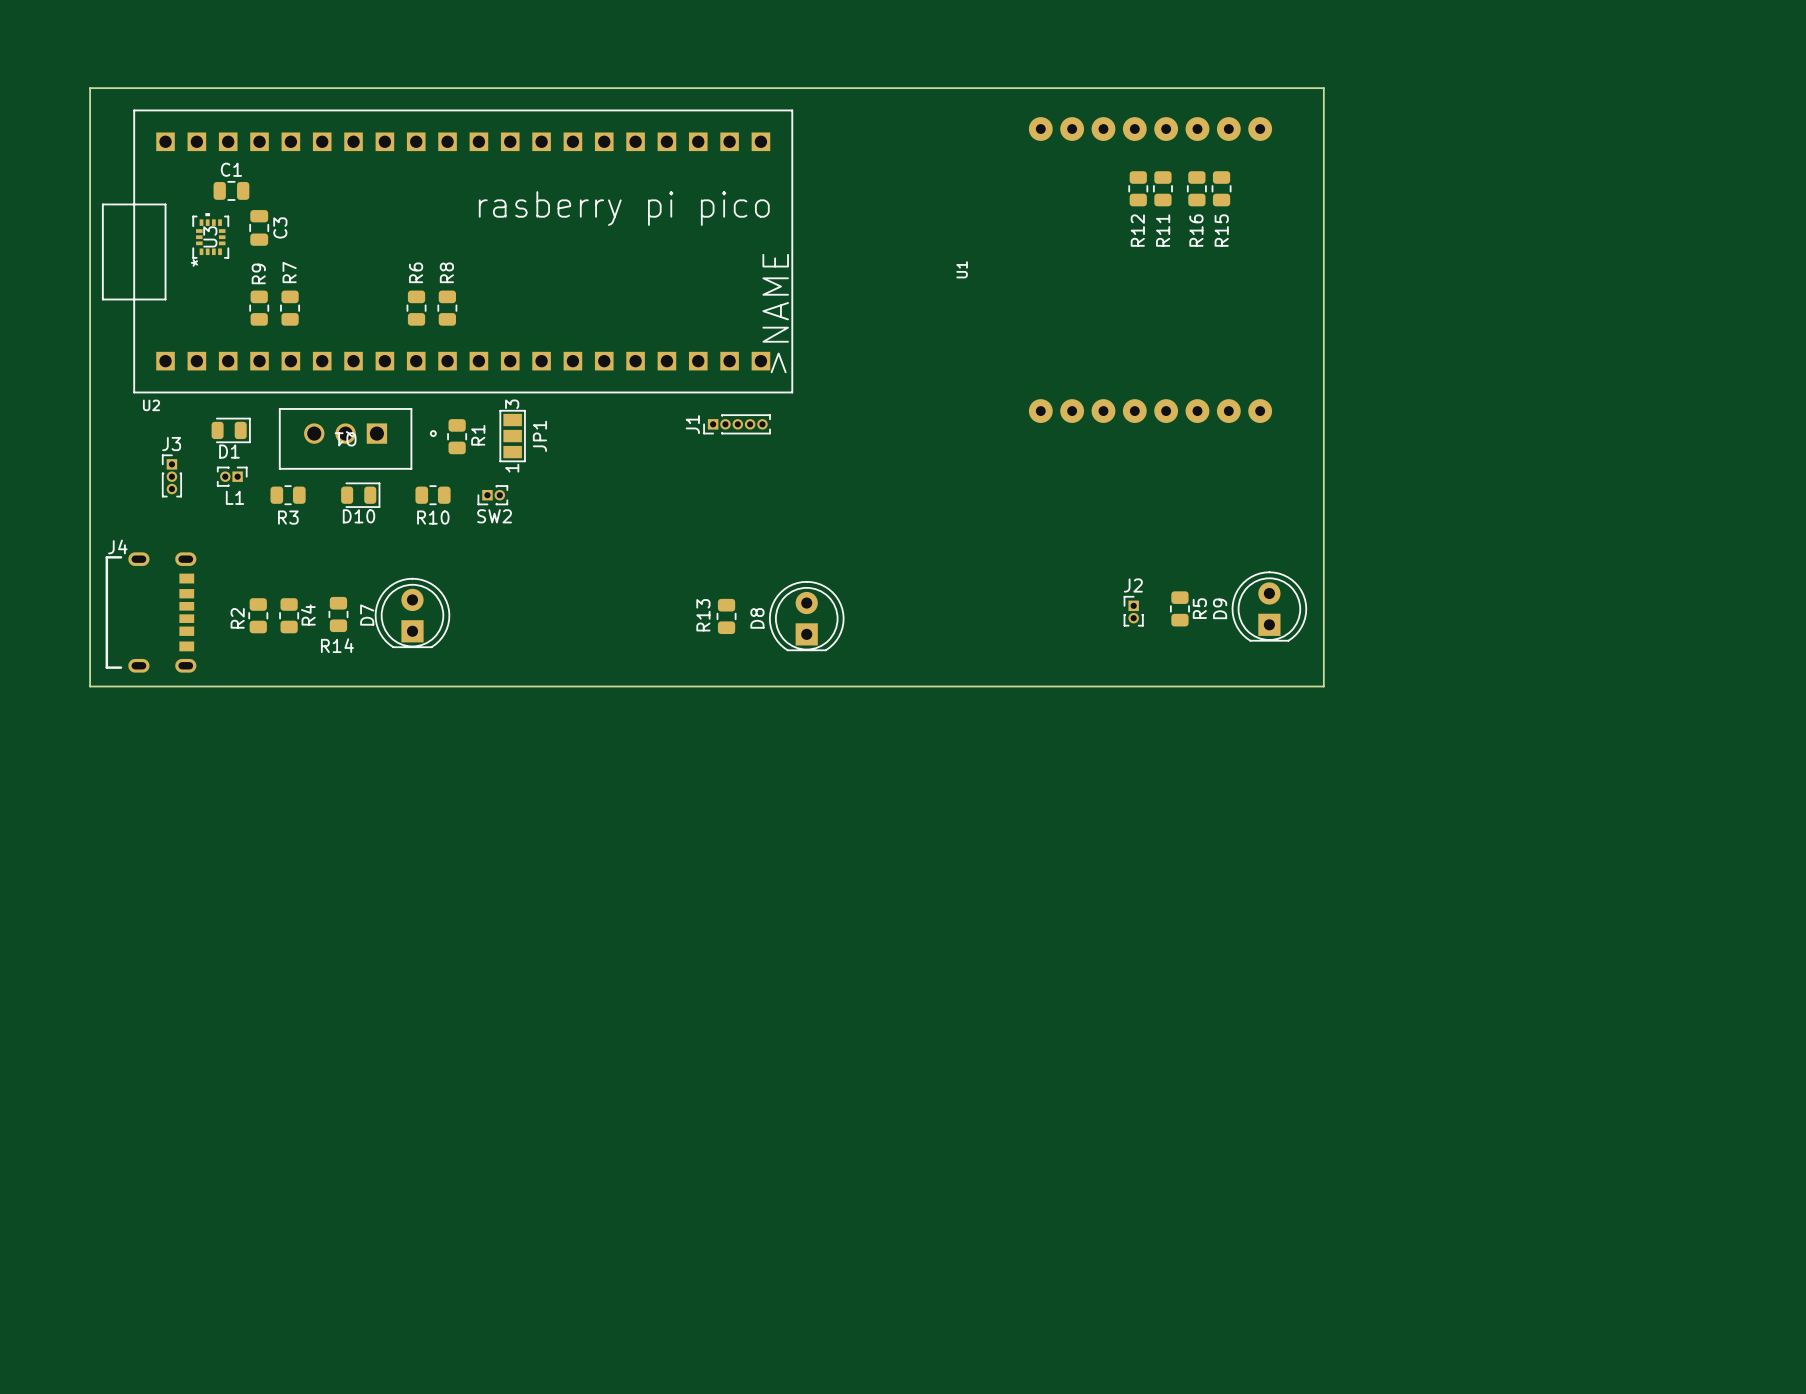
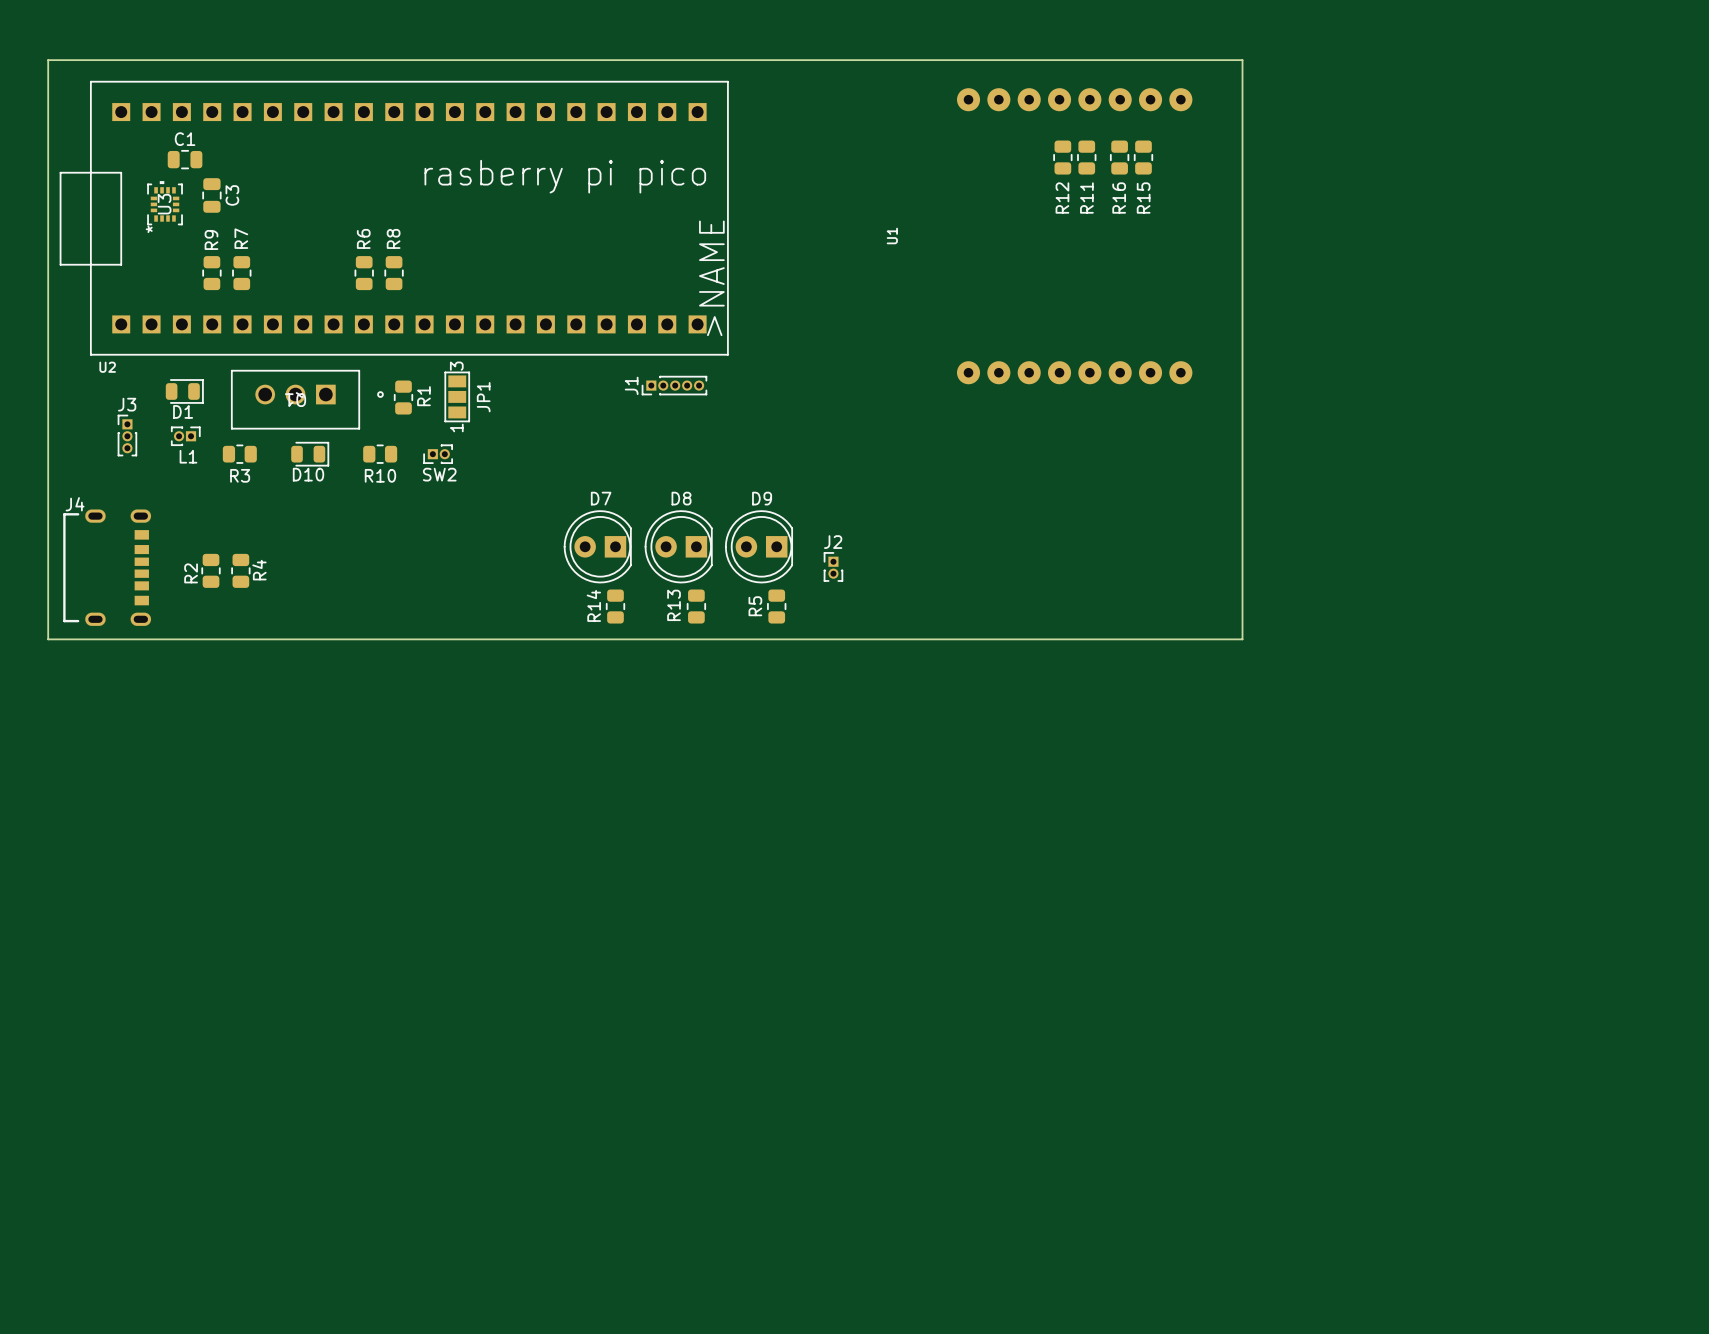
D9 footprint: [1231, 571, 1308, 642] -> [725, 510, 793, 584]
D7 footprint: [374, 577, 451, 648] -> [563, 510, 632, 584]
D8 footprint: [769, 581, 845, 652] -> [644, 510, 713, 584]
R5 position: (1179, 608) -> (776, 606)
R5 name position: R5 (1199, 608) -> R5 (755, 606)
D9 name position: D9 (1220, 608) -> D9 (762, 498)
J2 position: (1133, 611) -> (833, 566)
R14 position: (338, 614) -> (615, 606)
D7 name position: D7 (367, 615) -> D7 (601, 498)
R13 position: (726, 616) -> (696, 606)
D8 name position: D8 (757, 618) -> D8 (681, 498)
R14 name rotation: 0° (337, 645) -> 90° counterclockwise (593, 605)

